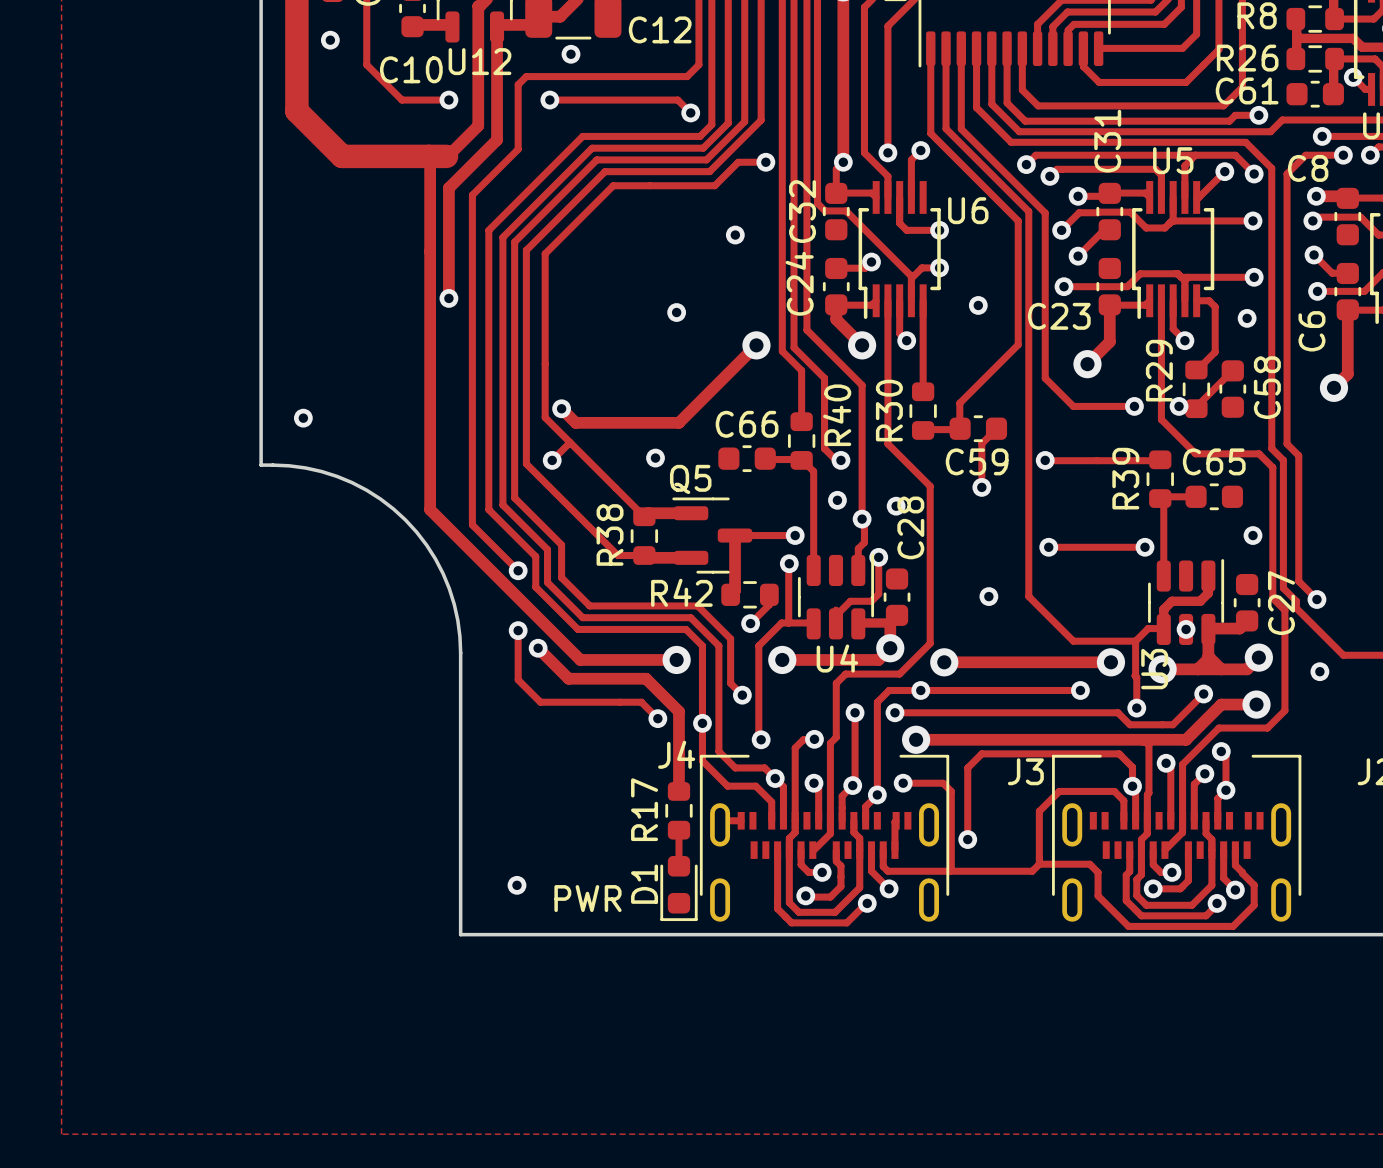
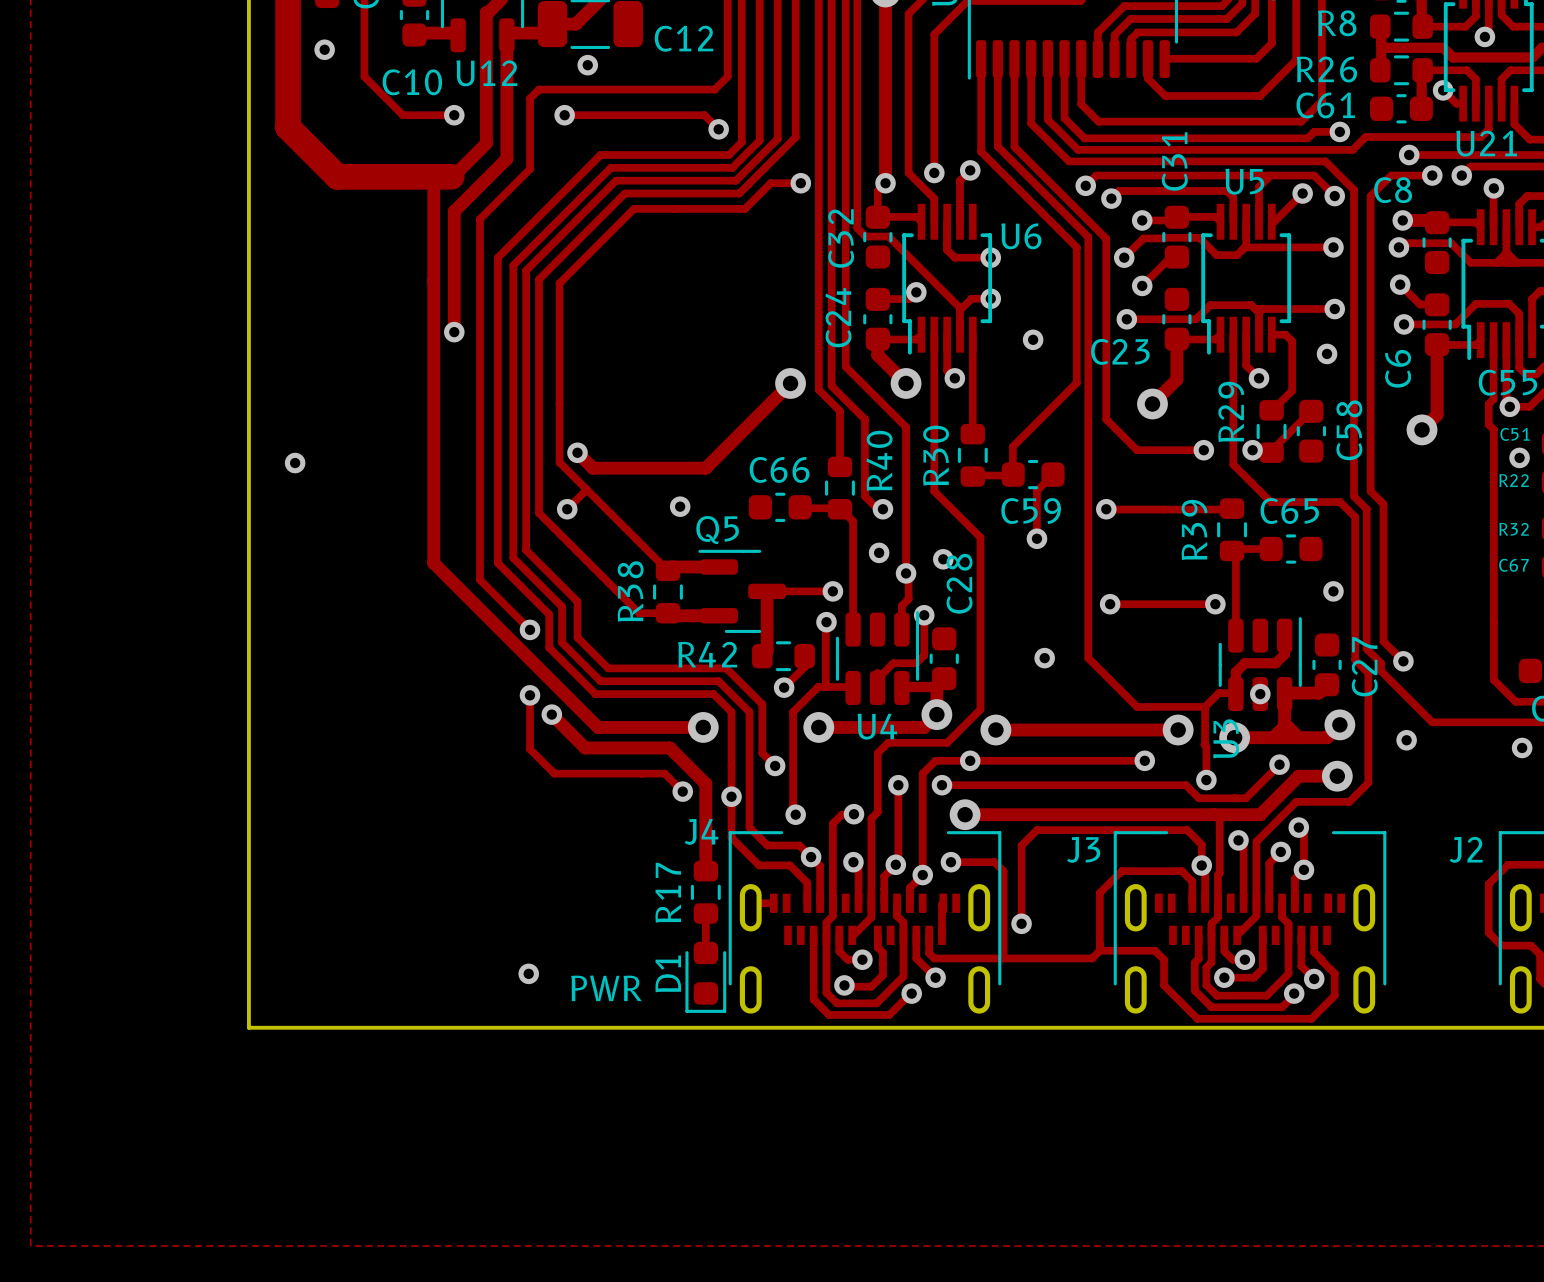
via: (735, 235) -> none
via: (676, 312) -> none
board edge: (261, 465) (289, 465) (321, 471) (366, 490) (405, 520) (426, 545) (443, 573) (454, 604) (459, 636) (460, 934) -> (248, 514) (248, 1027) (467, 1027)

